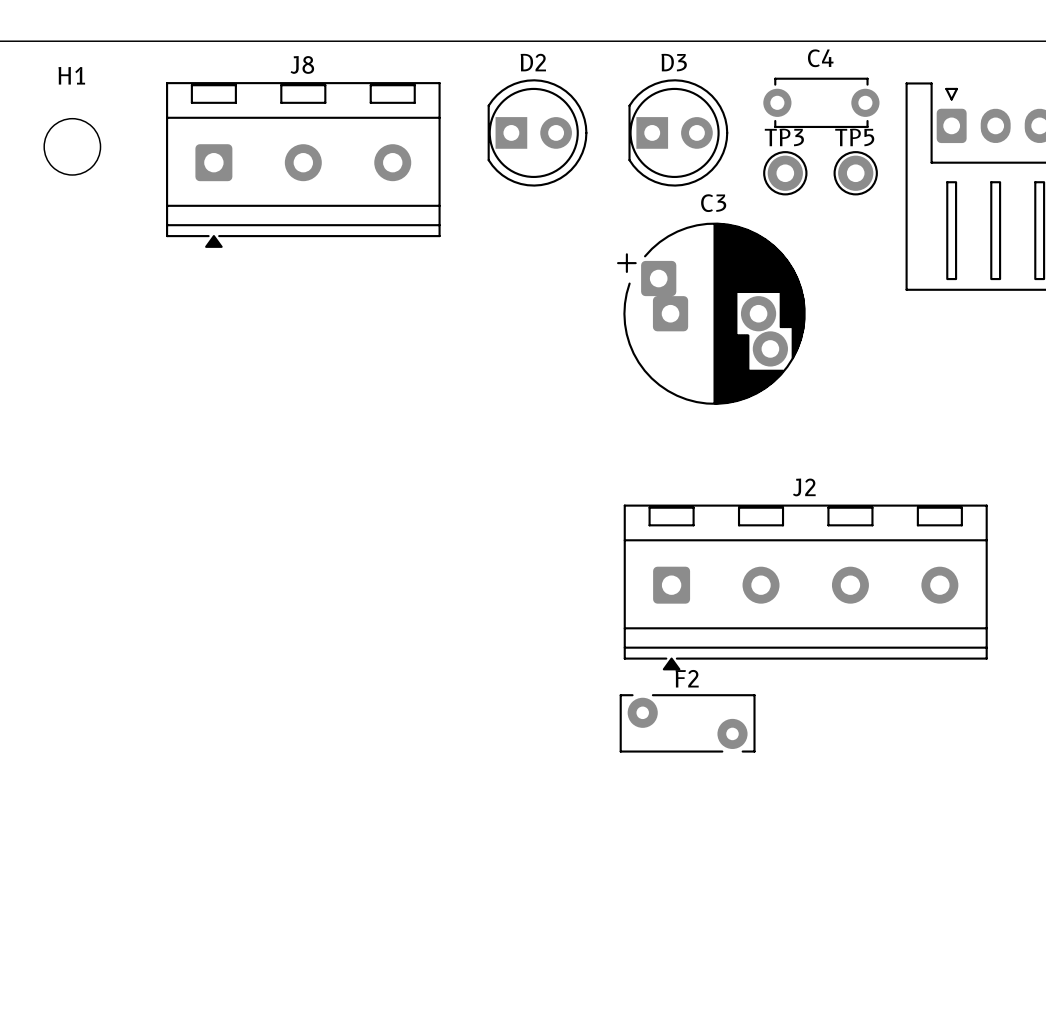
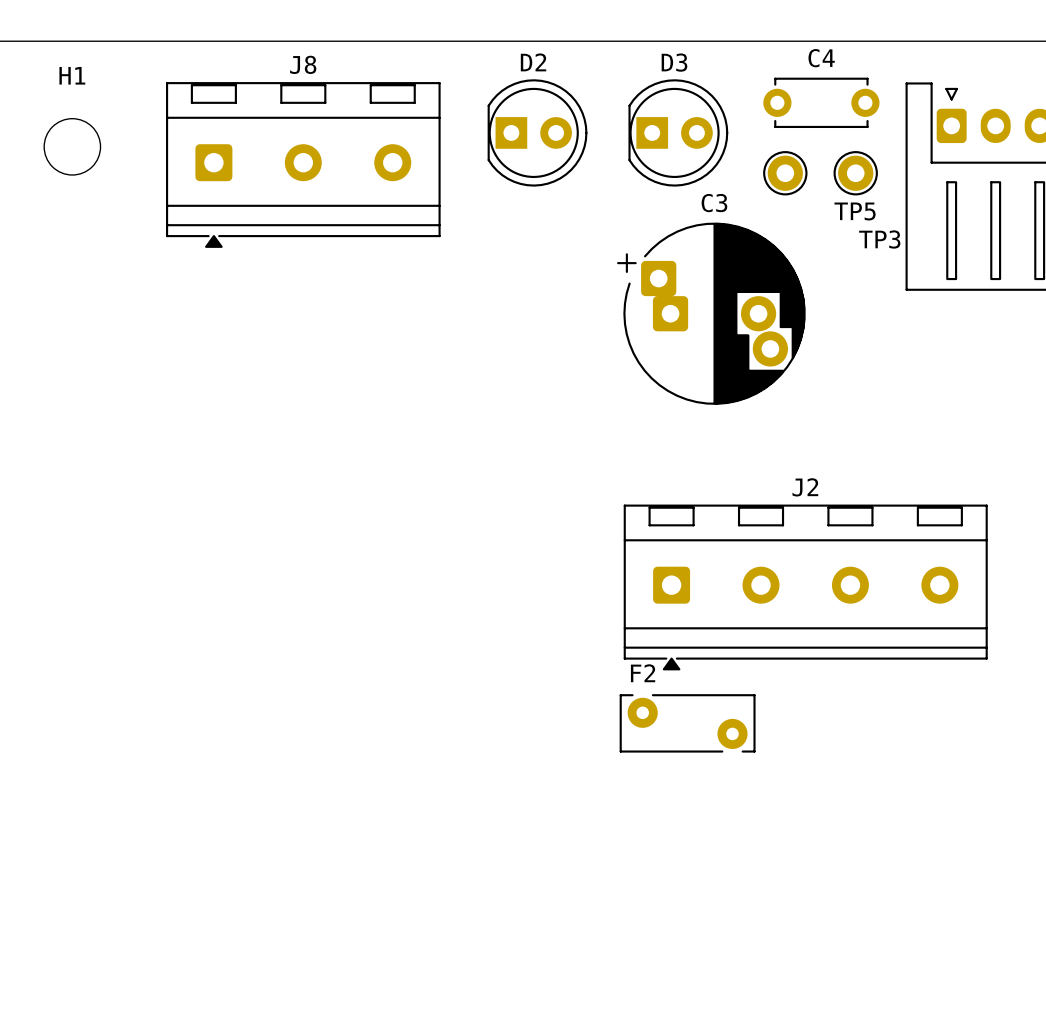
TP3 name position: TP3 (784, 137) -> TP3 (879, 239)
TP5 name position: TP5 (854, 137) -> TP5 (855, 211)
F2 name position: F2 (687, 678) -> F2 (643, 673)

